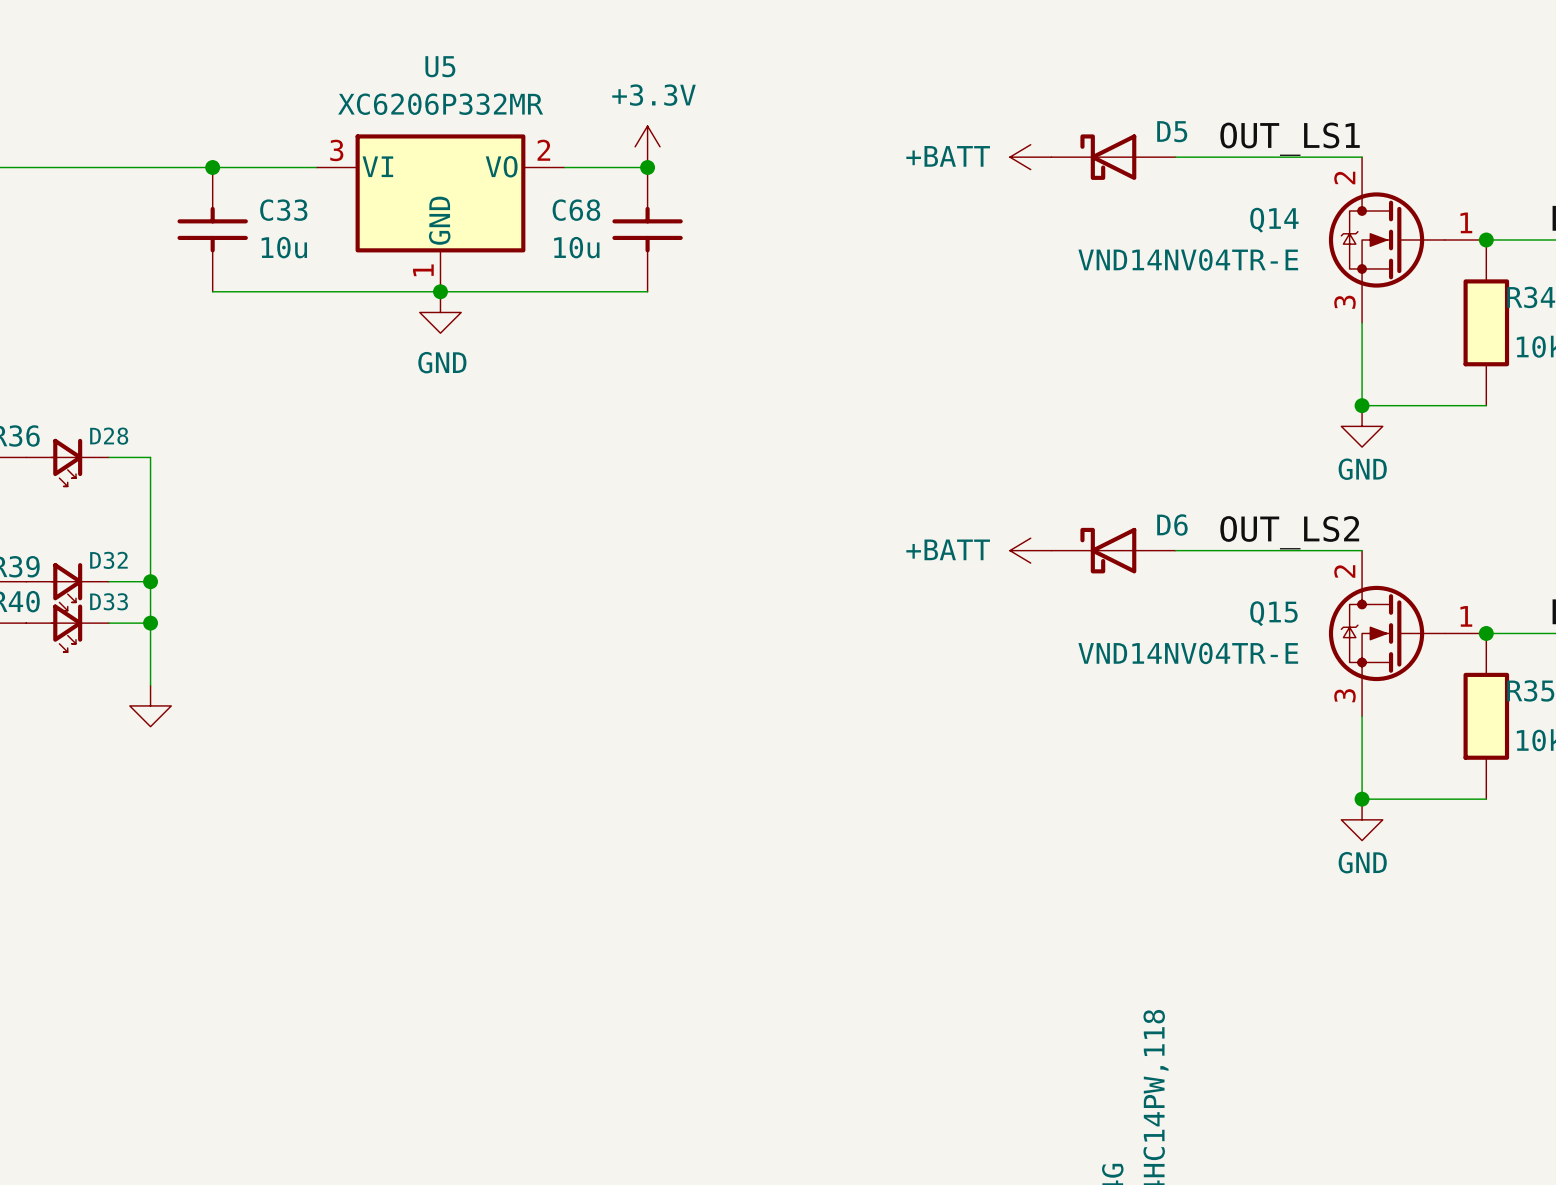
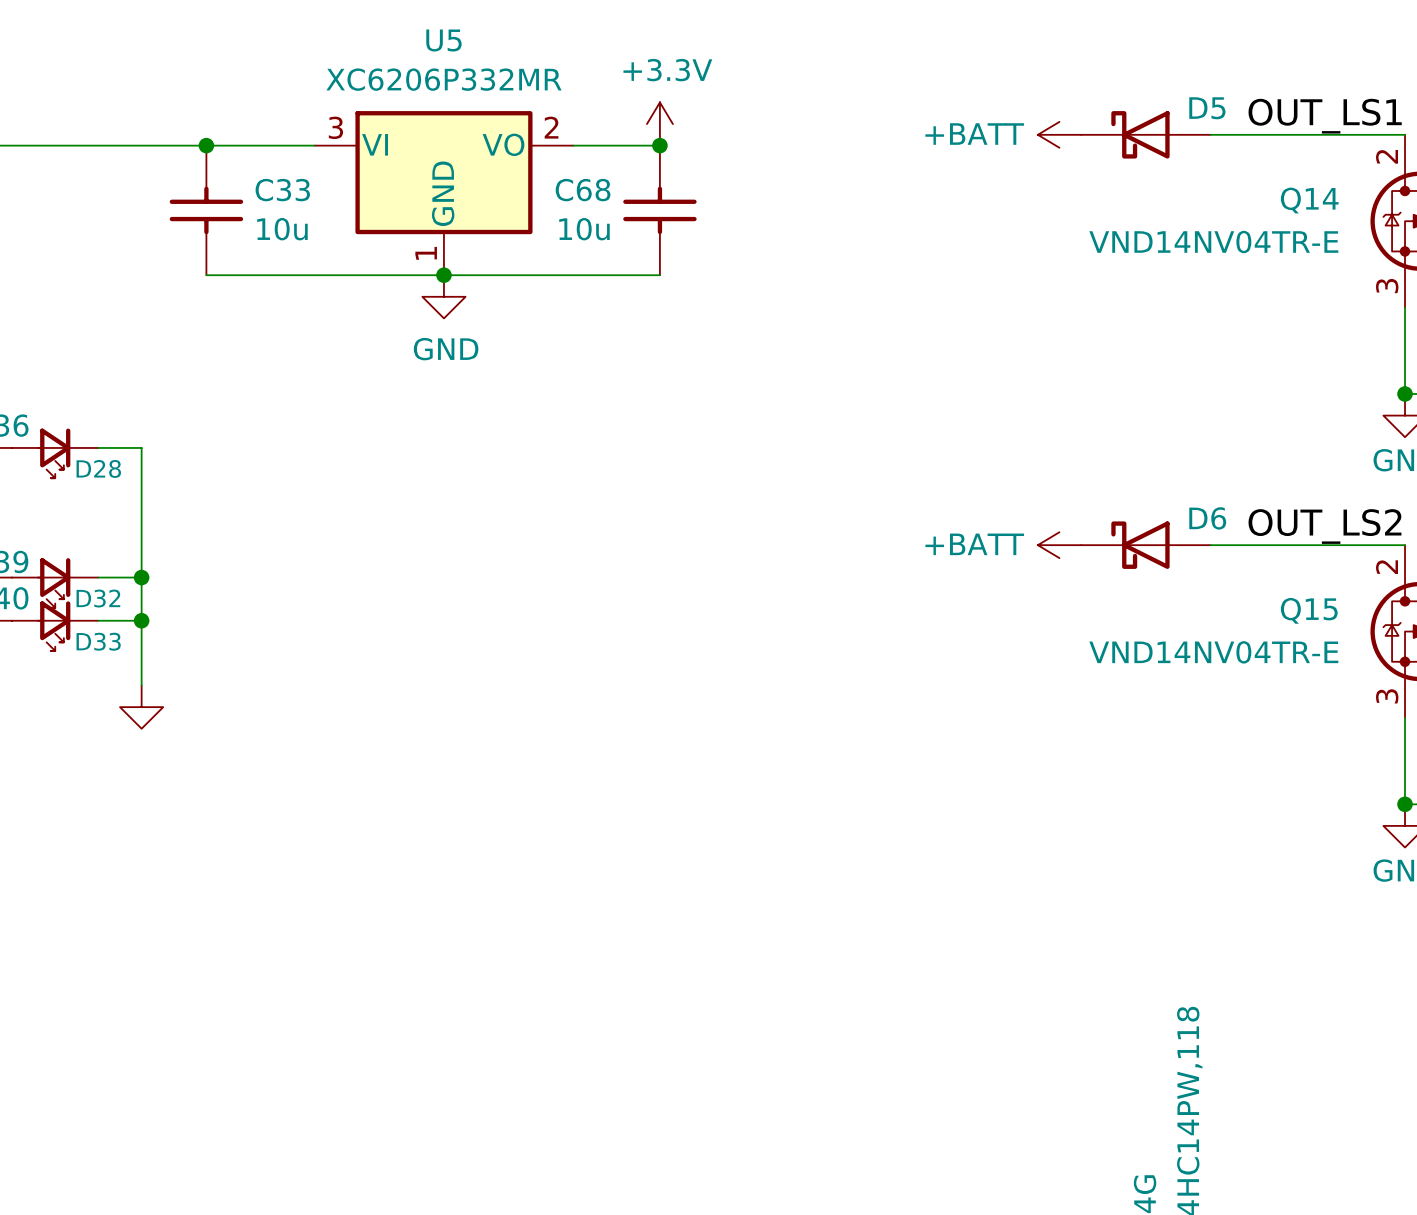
D28 name position: D28 (109, 436) -> D28 (98, 468)
D32 name position: D32 (108, 560) -> D32 (98, 598)
D33 name position: D33 (109, 601) -> D33 (98, 641)

